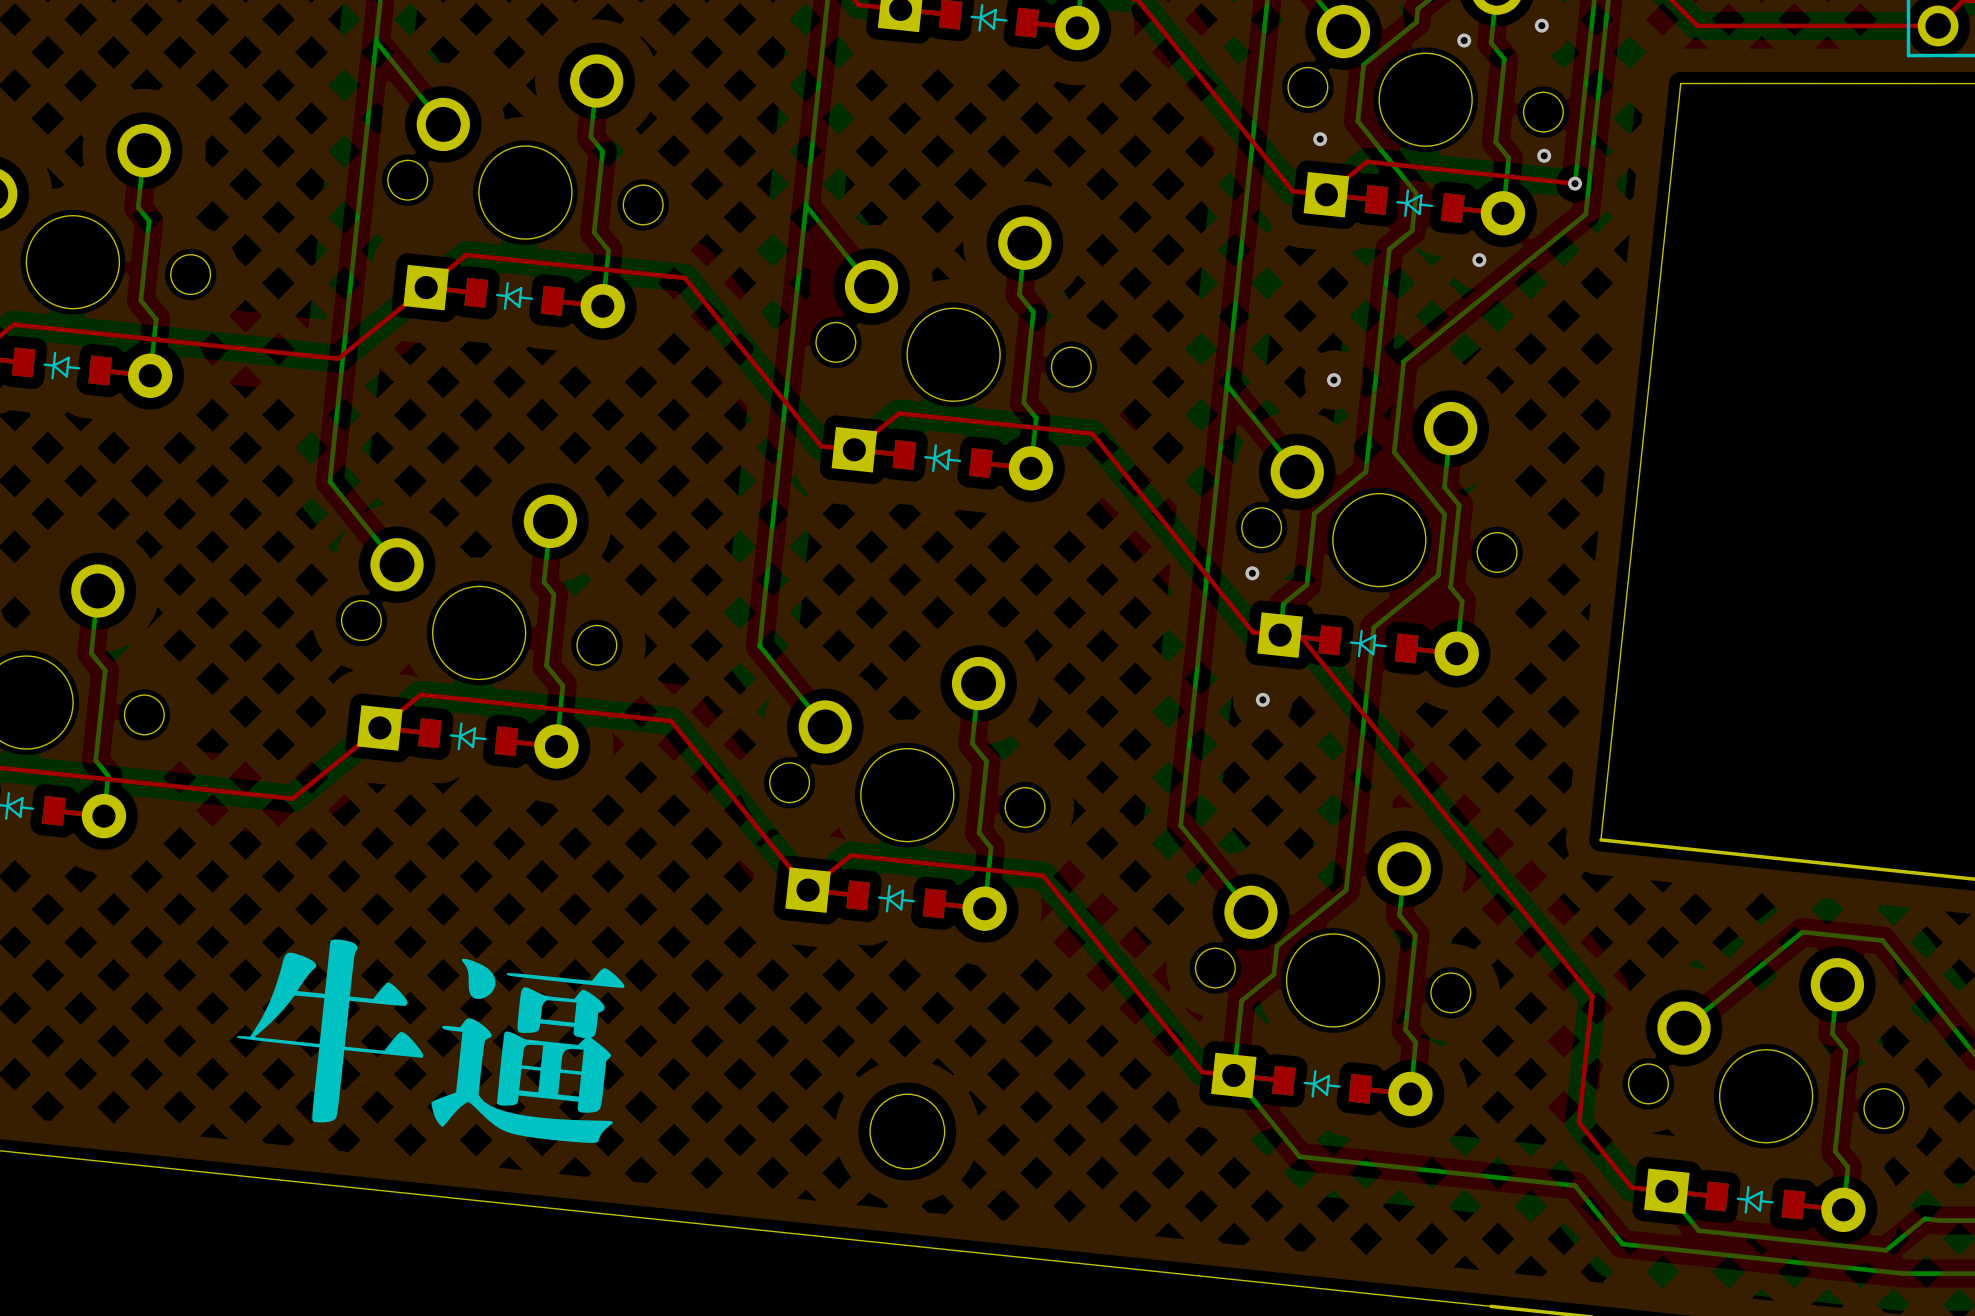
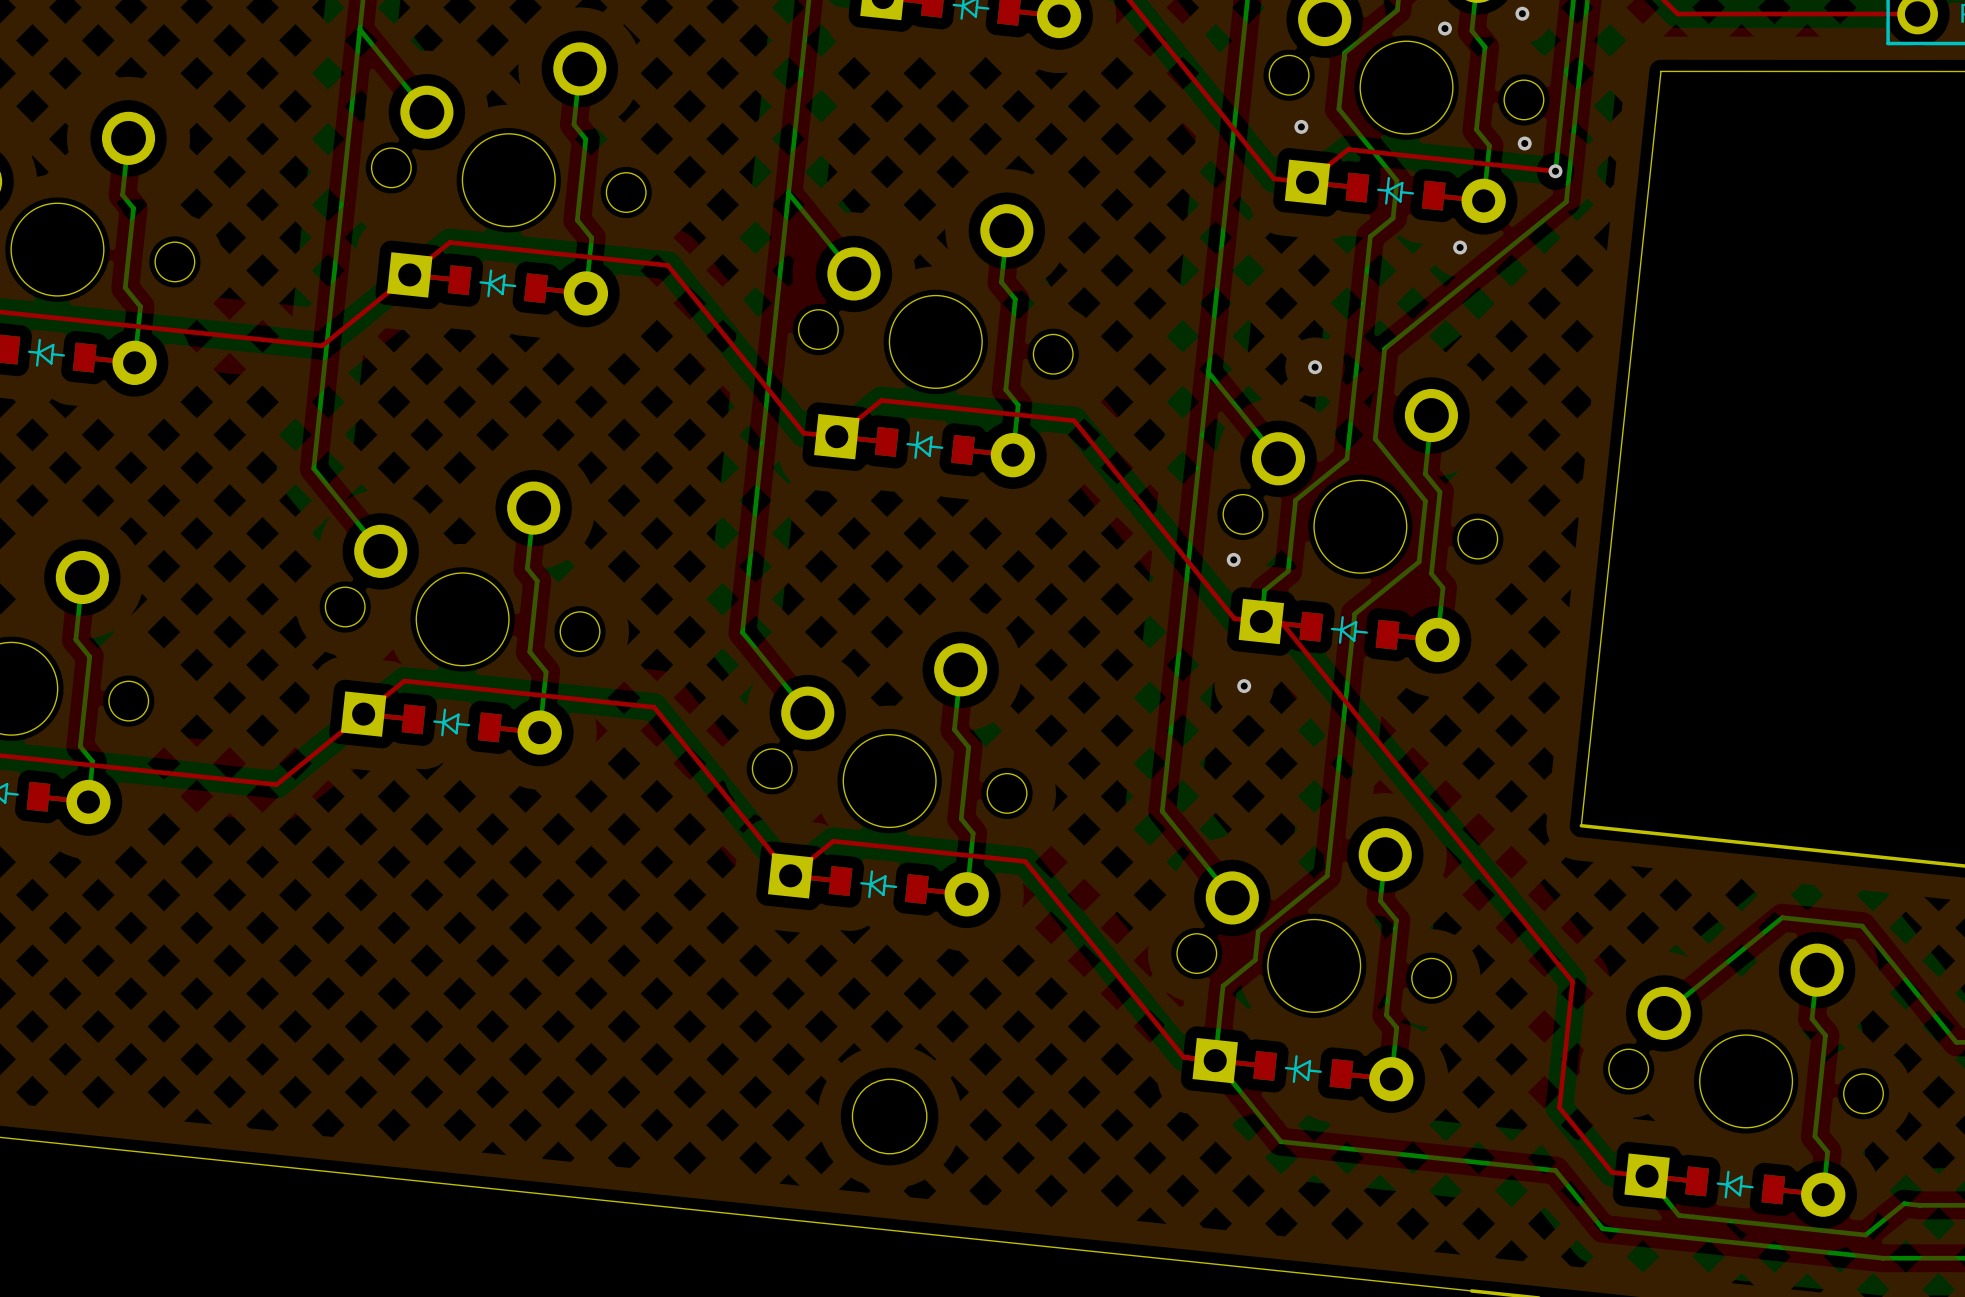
drawing: [236, 939, 625, 1143] -> none

